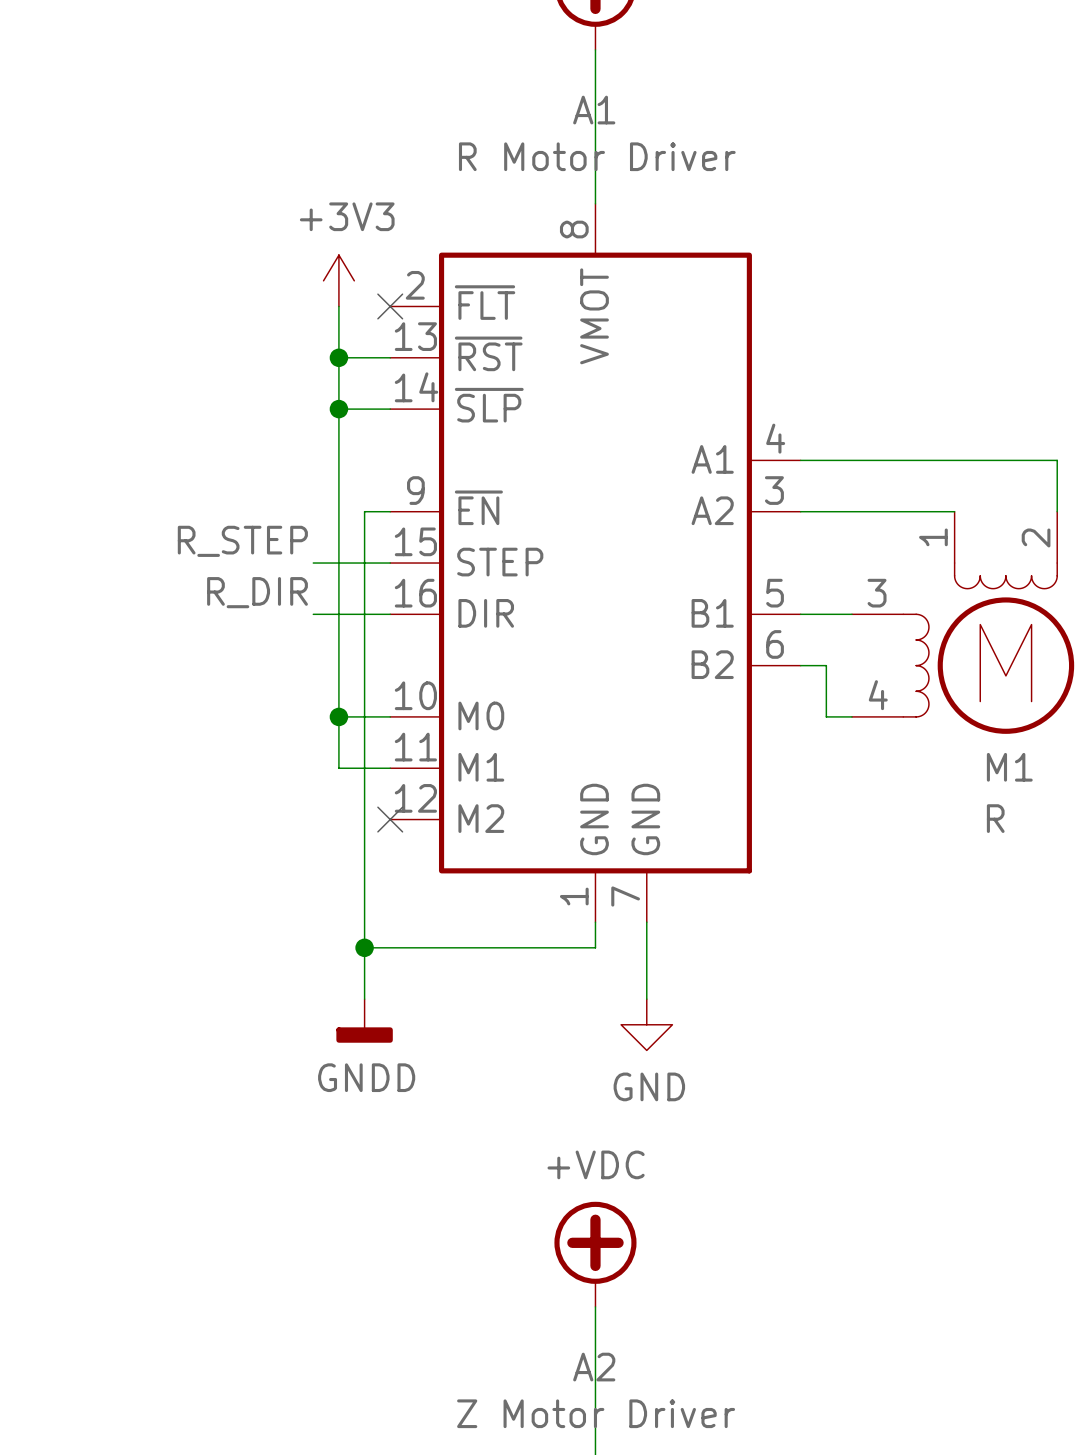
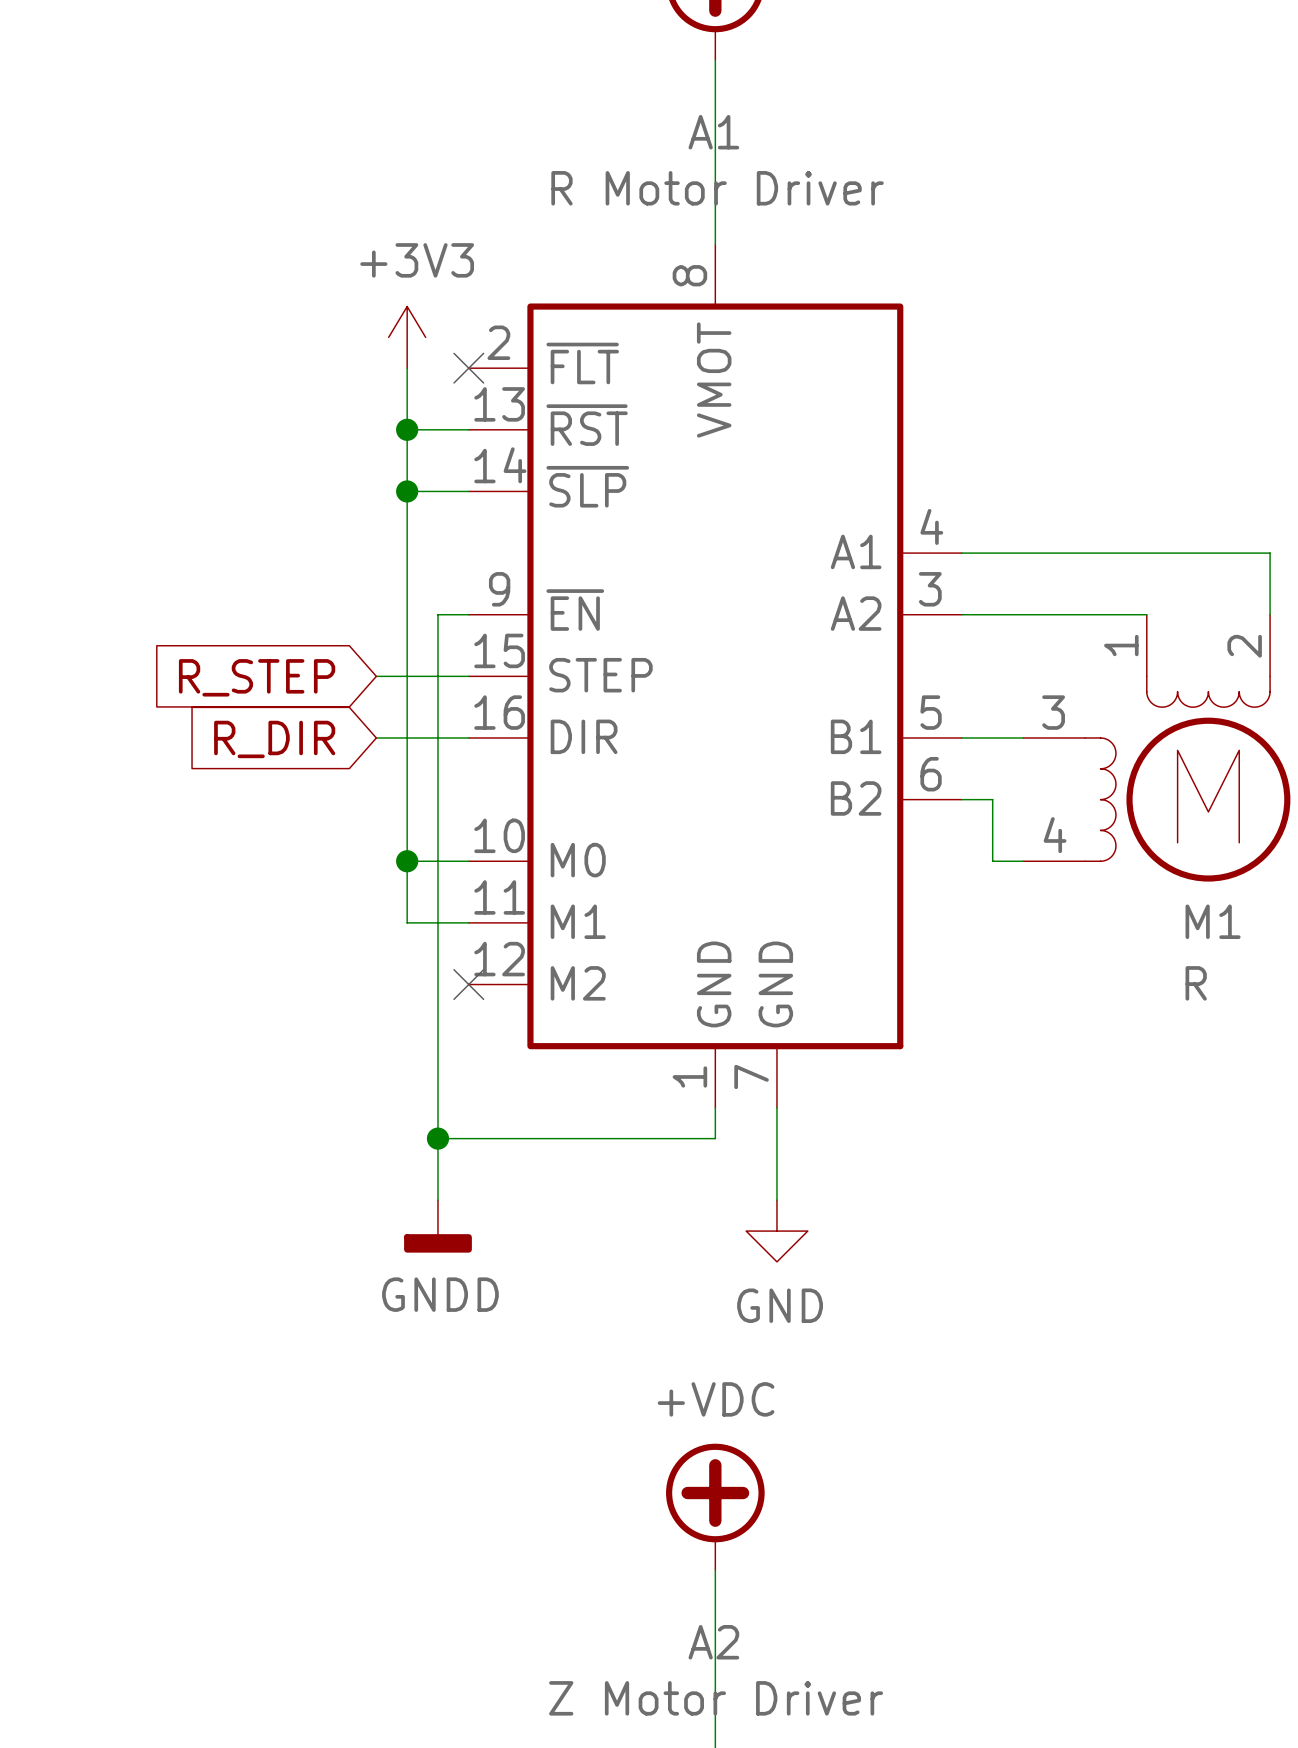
label: R_STEP (242, 541) -> none
global label: none -> R_STEP (257, 677)
label: R_DIR (257, 592) -> none
global label: none -> R_DIR (274, 739)

